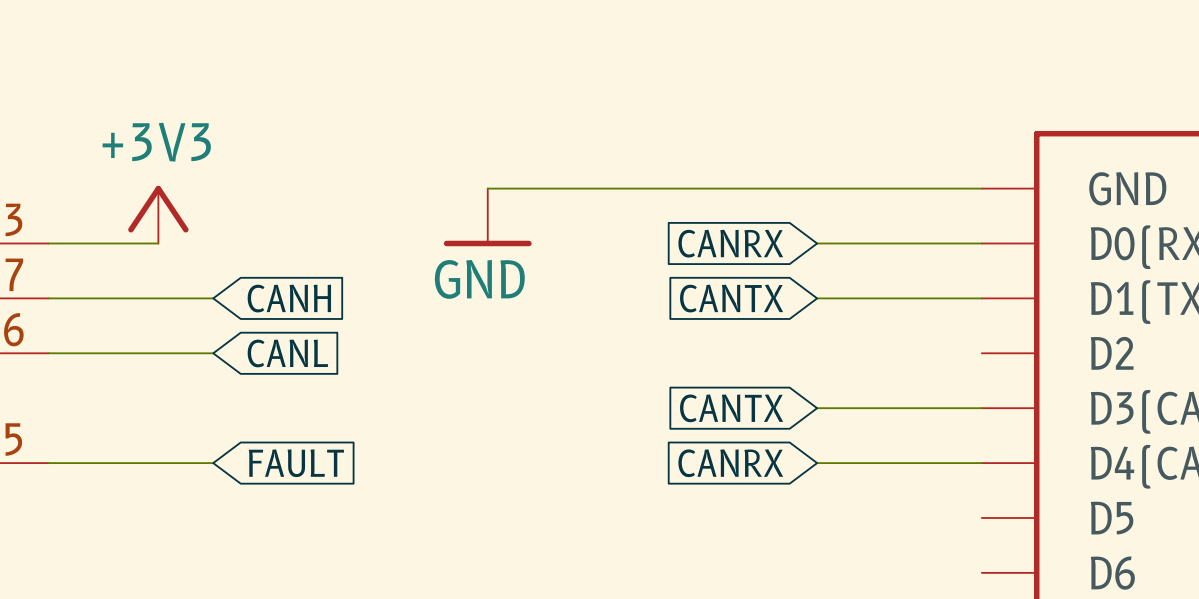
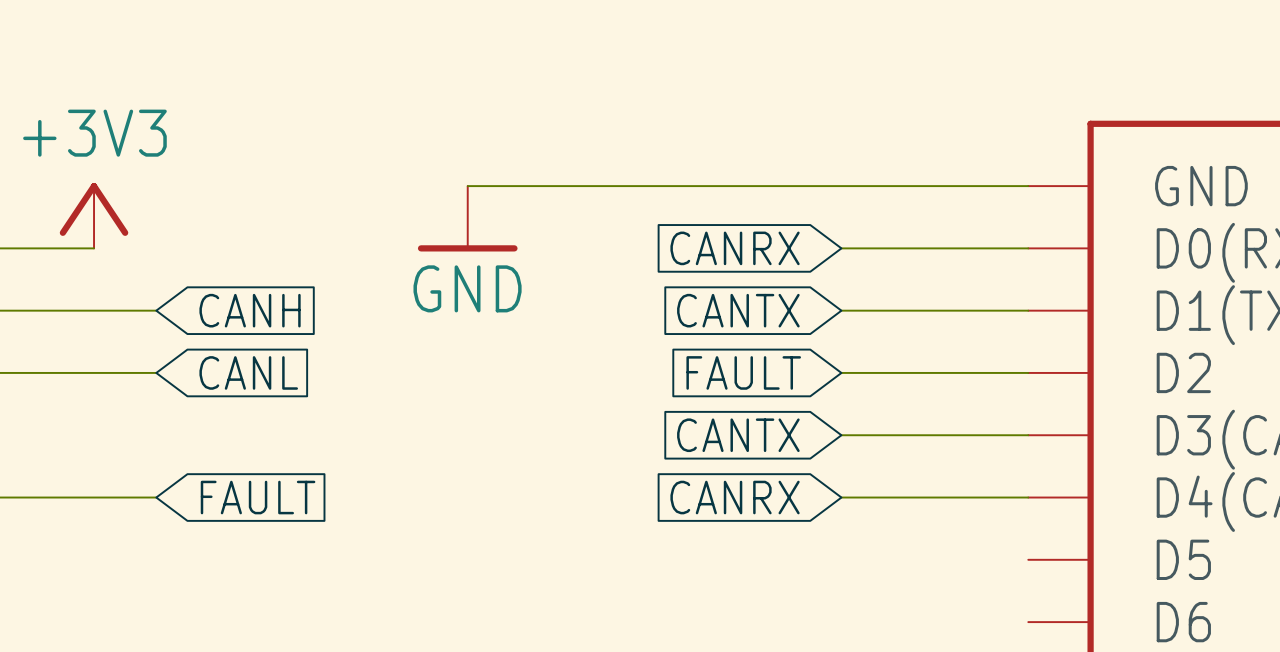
global label: none -> FAULT (743, 372)
wire: none -> (841, 372) (1028, 372)

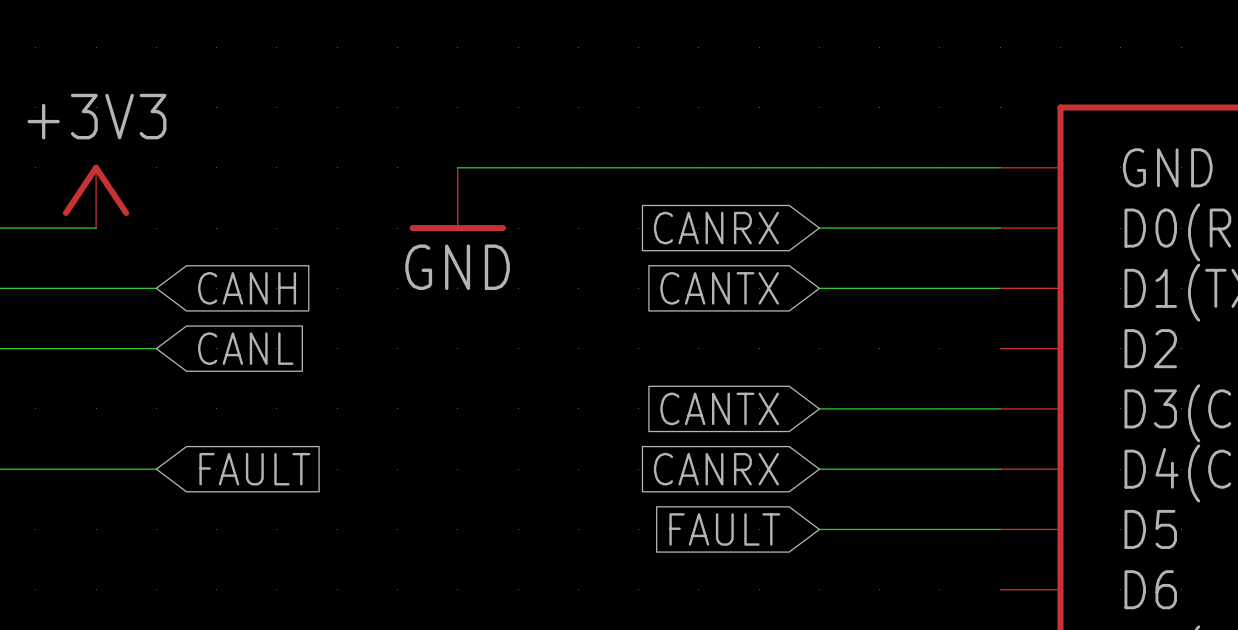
global label position: FAULT (743, 372) -> FAULT (724, 529)
wire: (841, 372) (1028, 372) -> (819, 529) (1000, 529)

